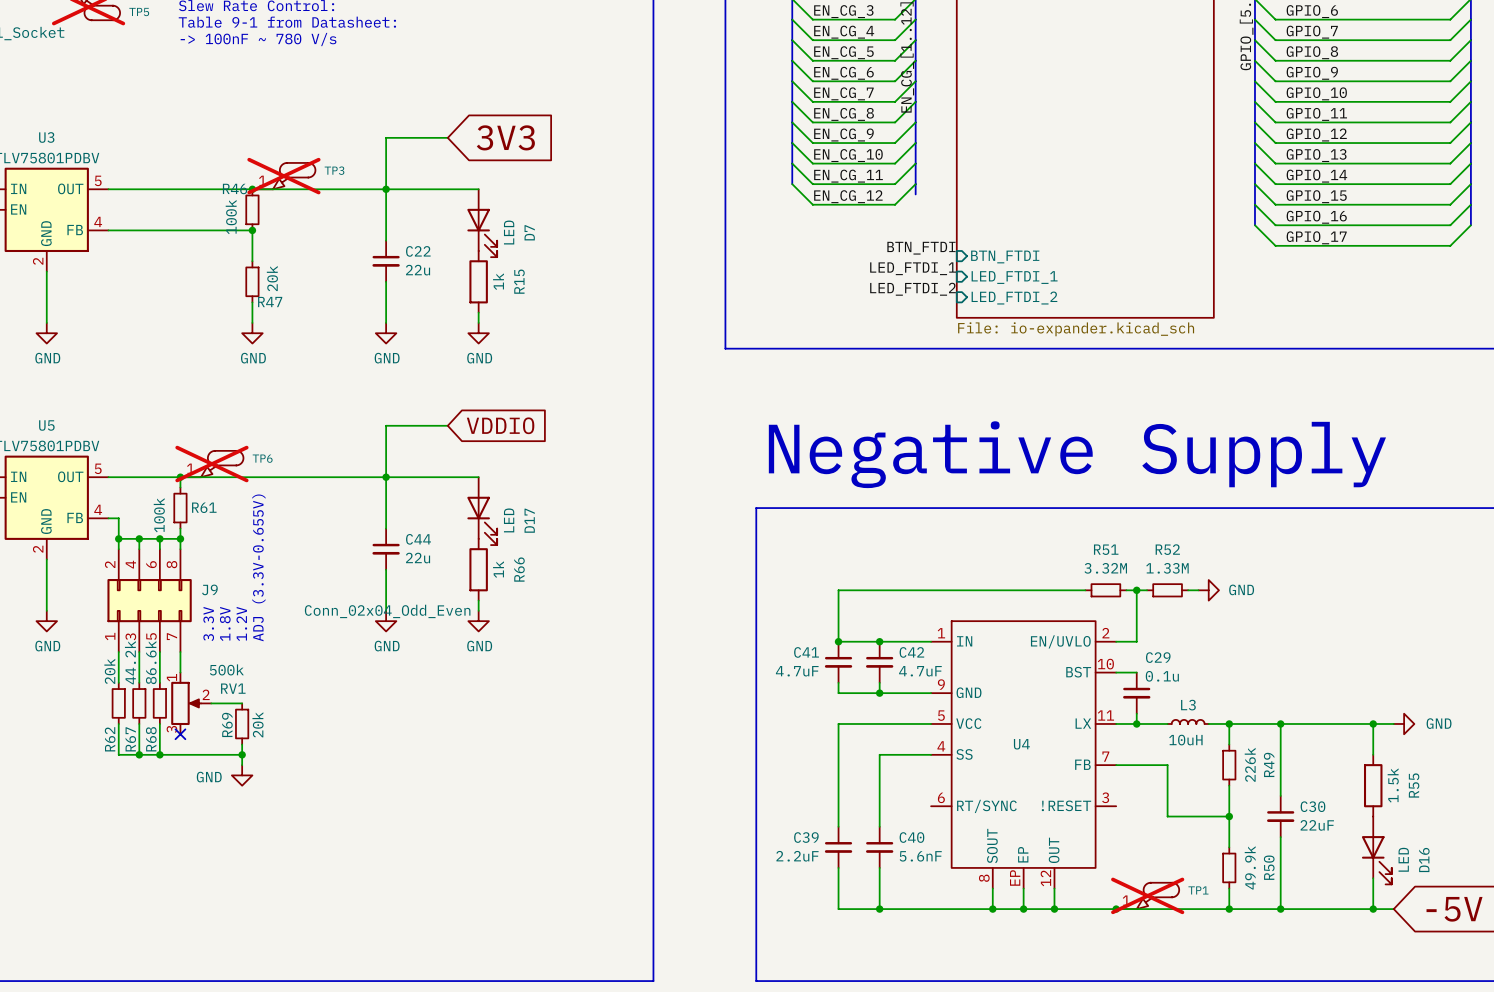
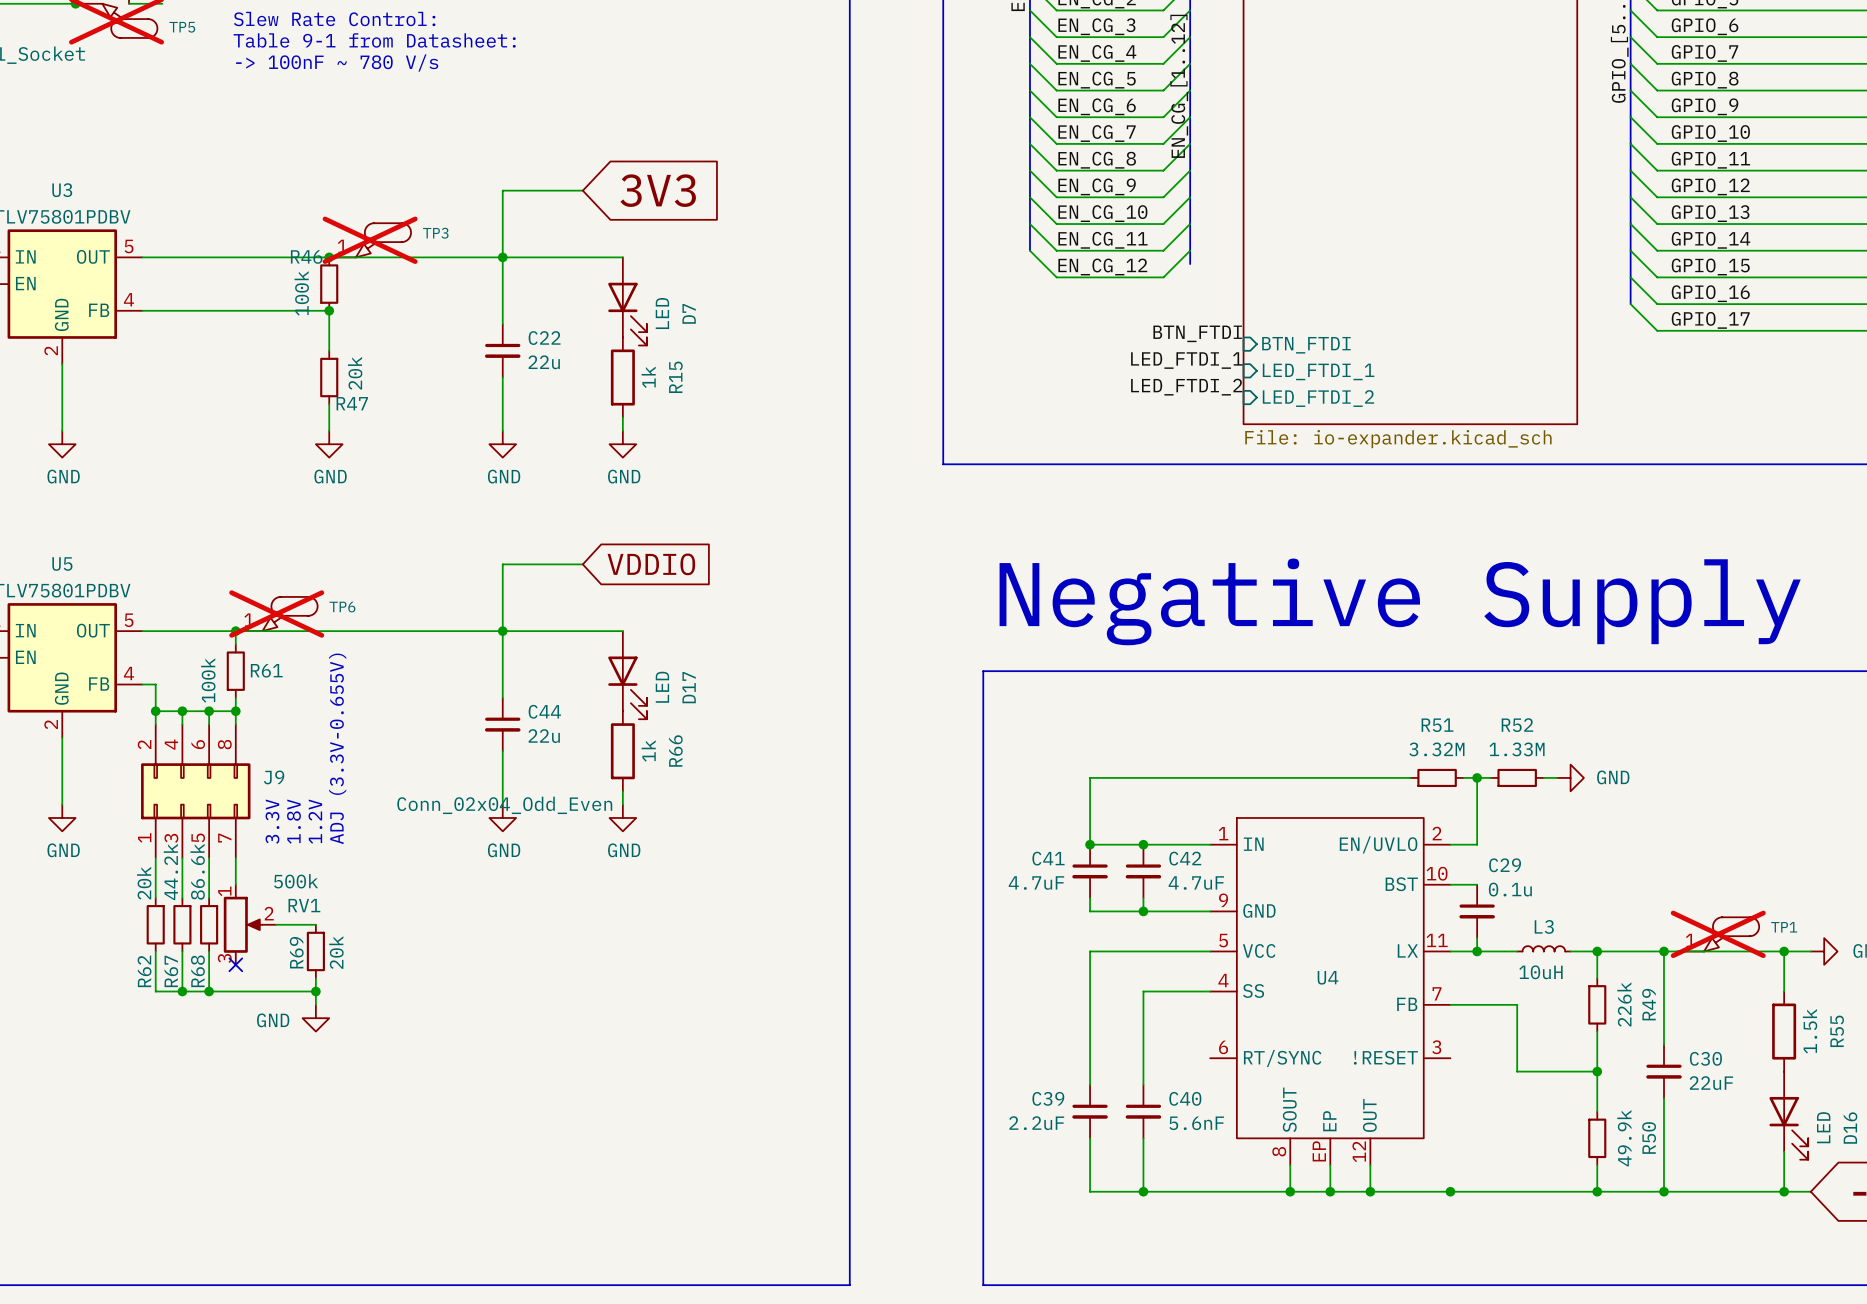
TP1 position: (1147, 895) -> (1718, 934)

